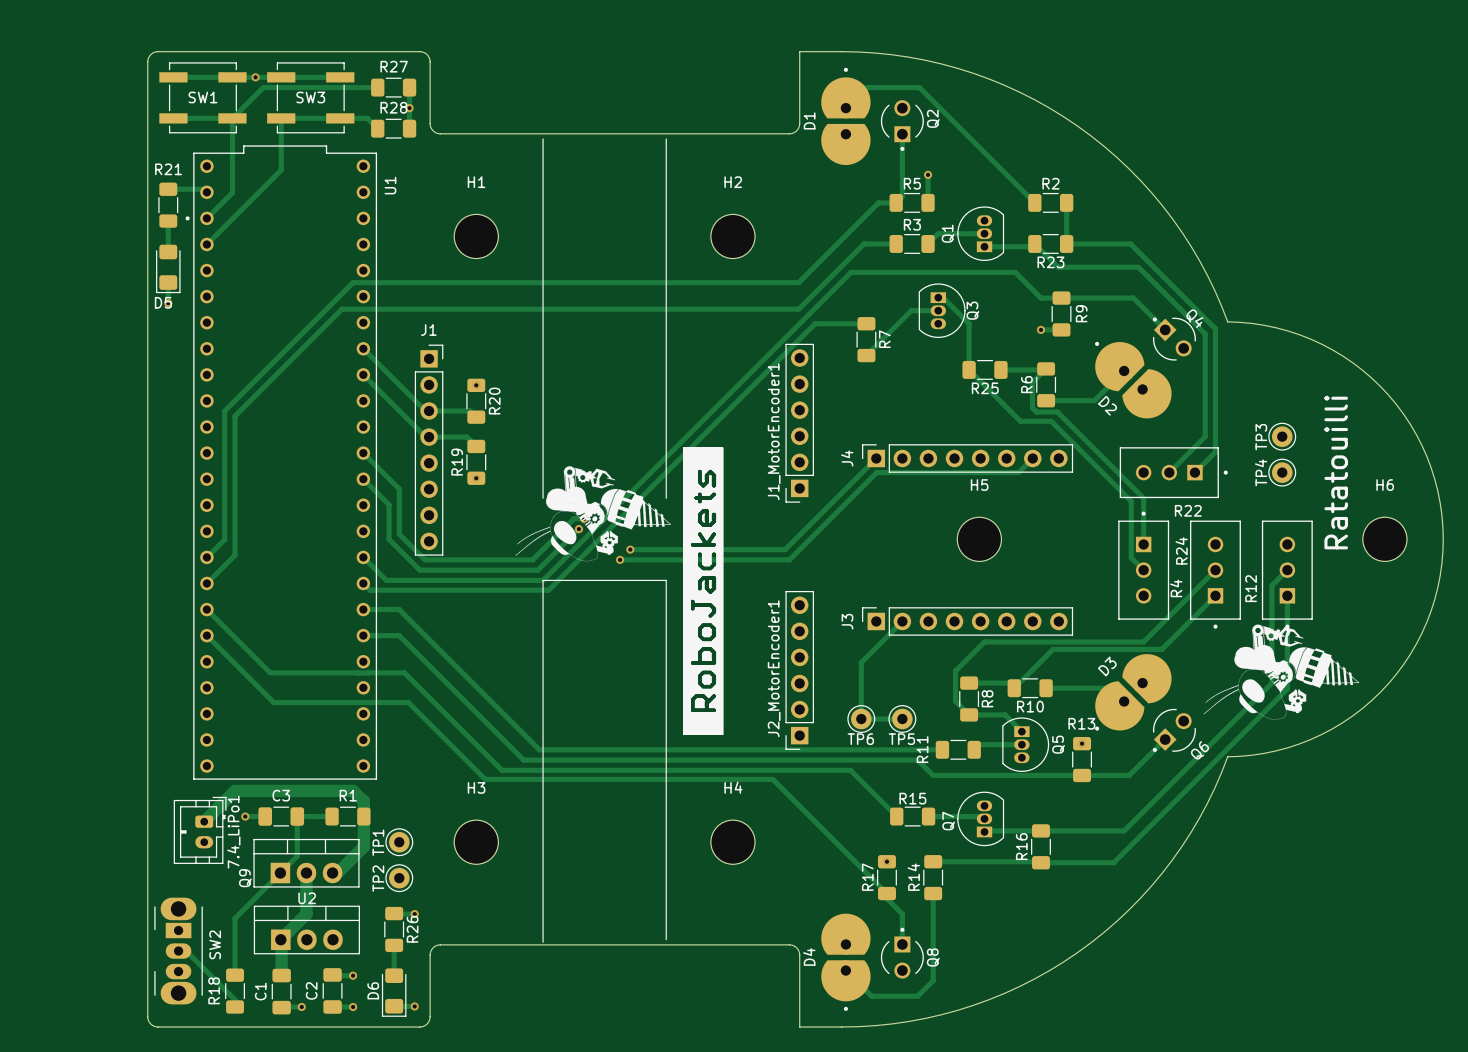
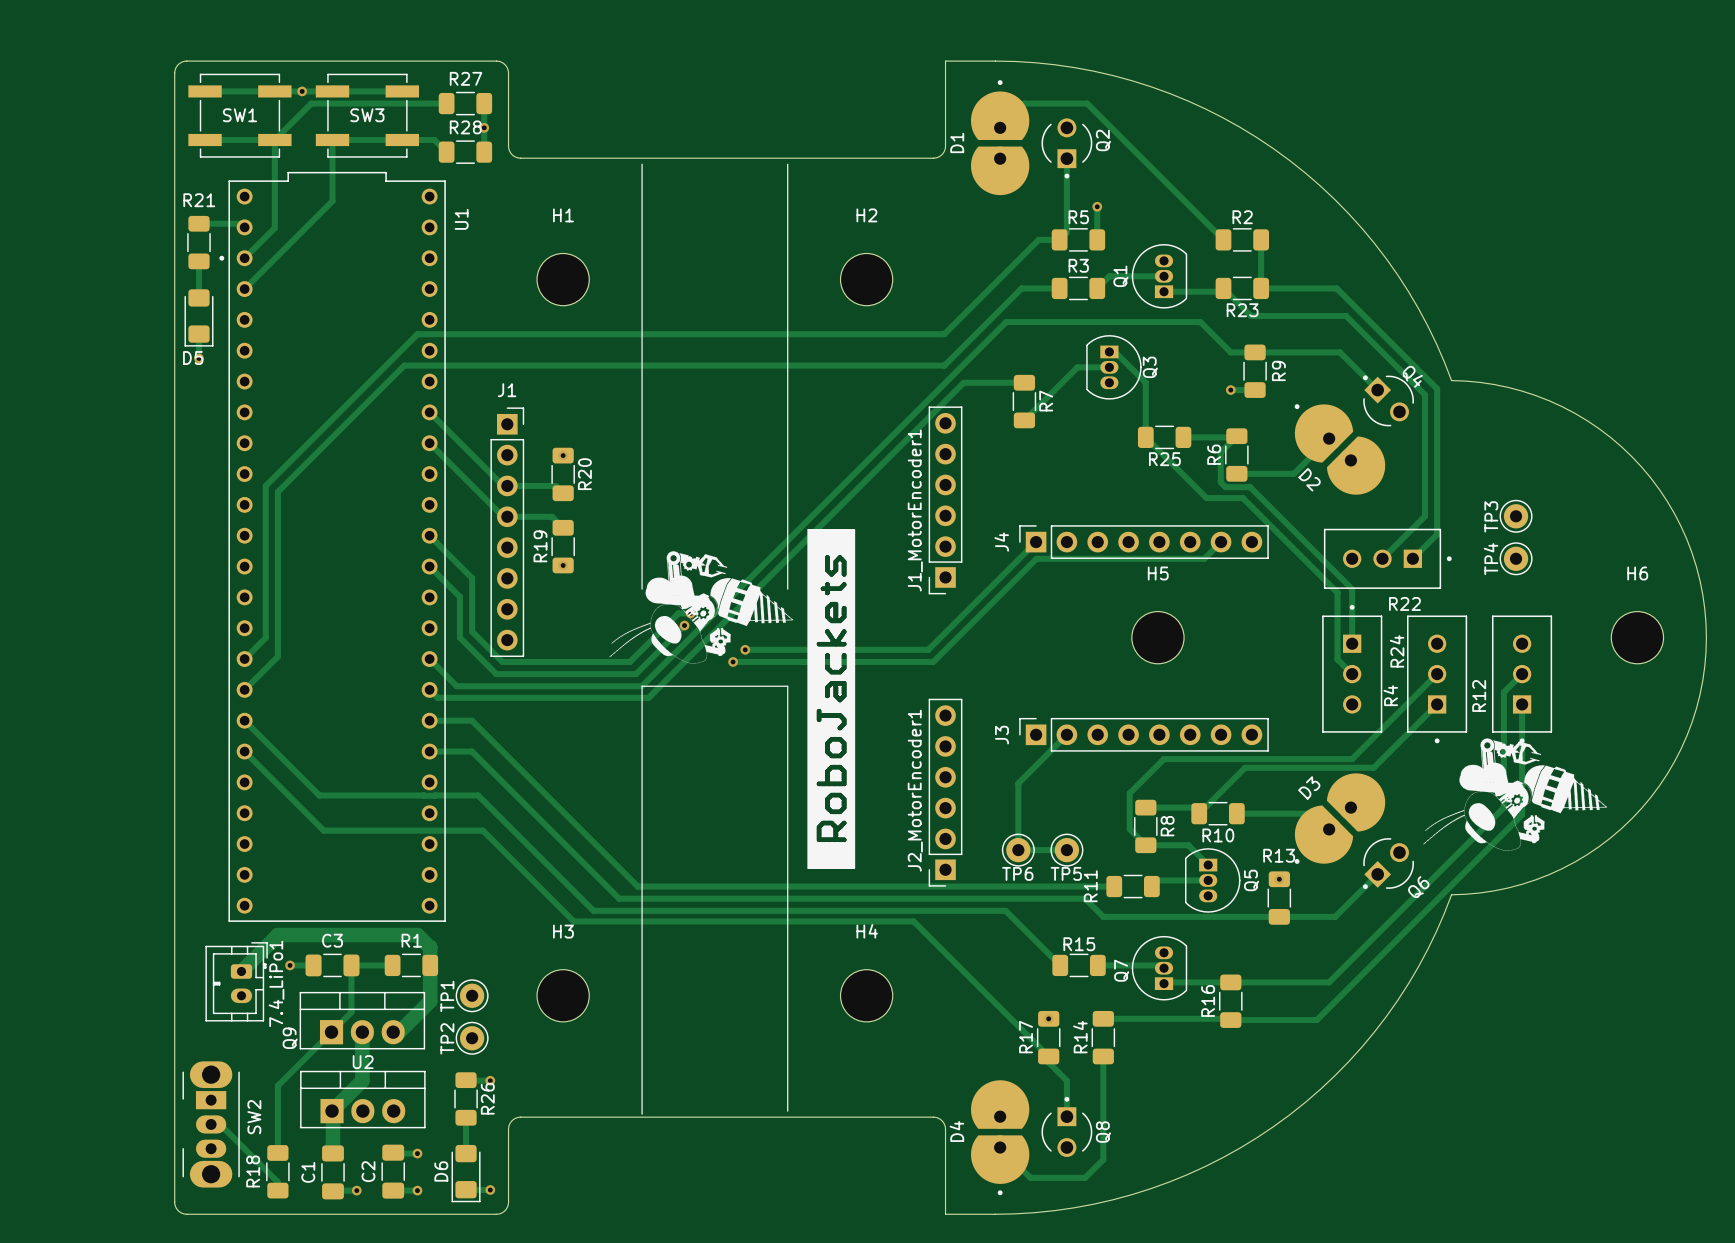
text: Ratatouilli (1336, 472) -> none

